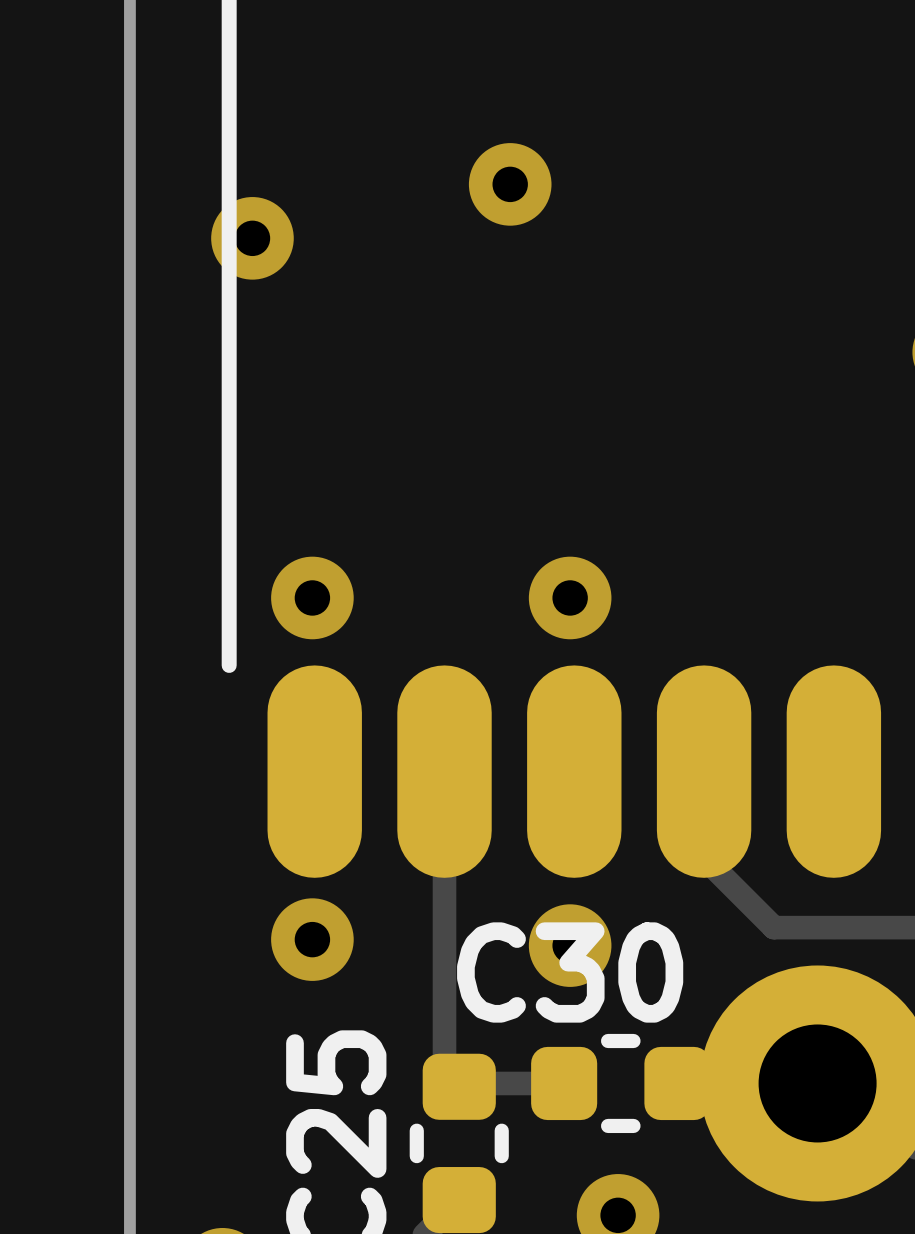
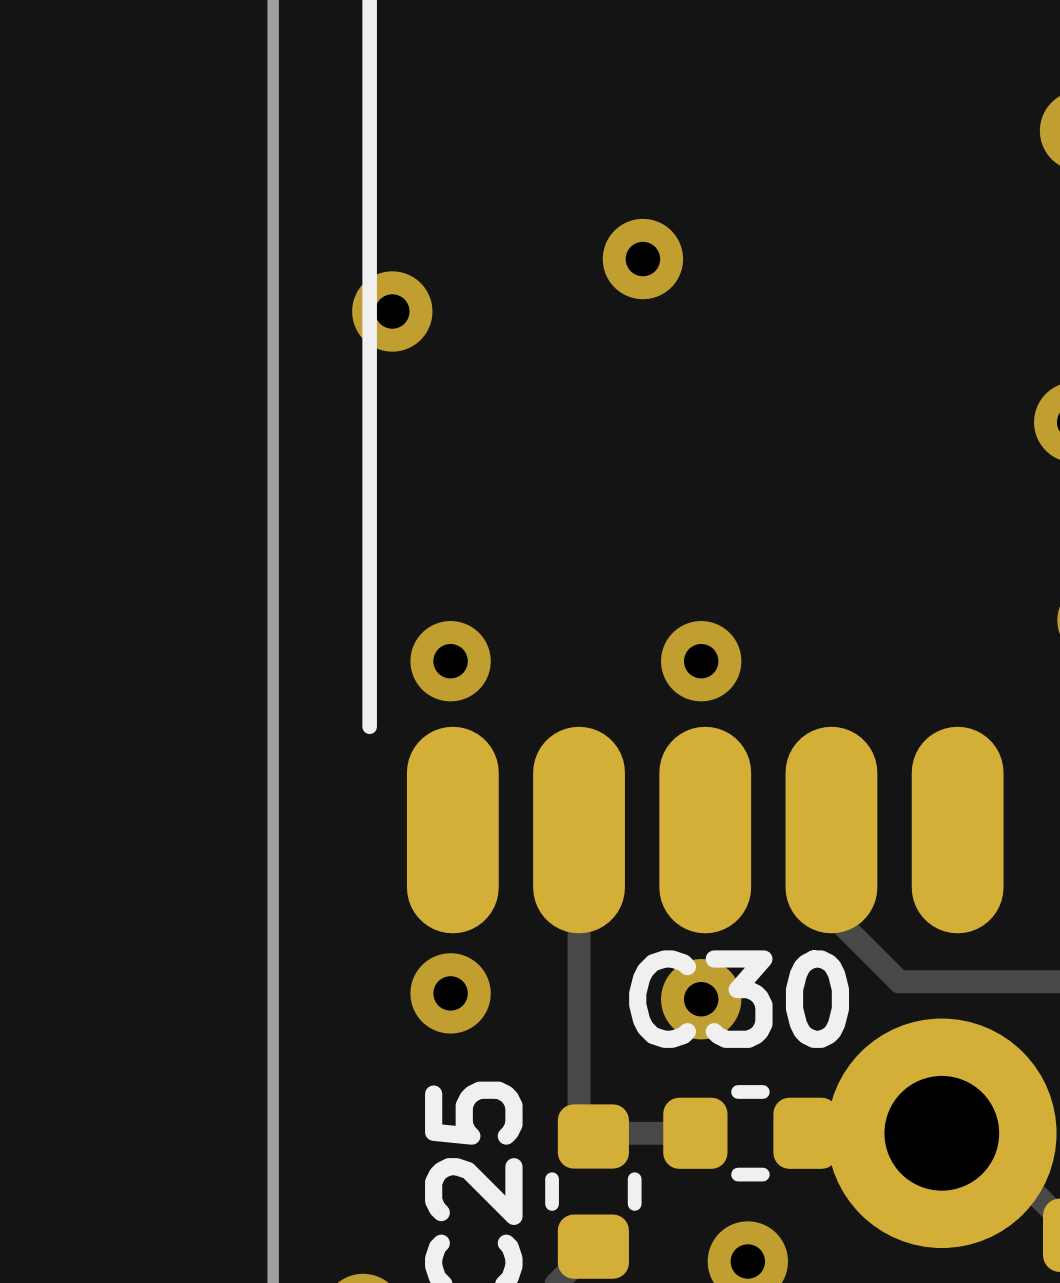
C30 name position: C30 (570, 972) -> C30 (739, 999)

